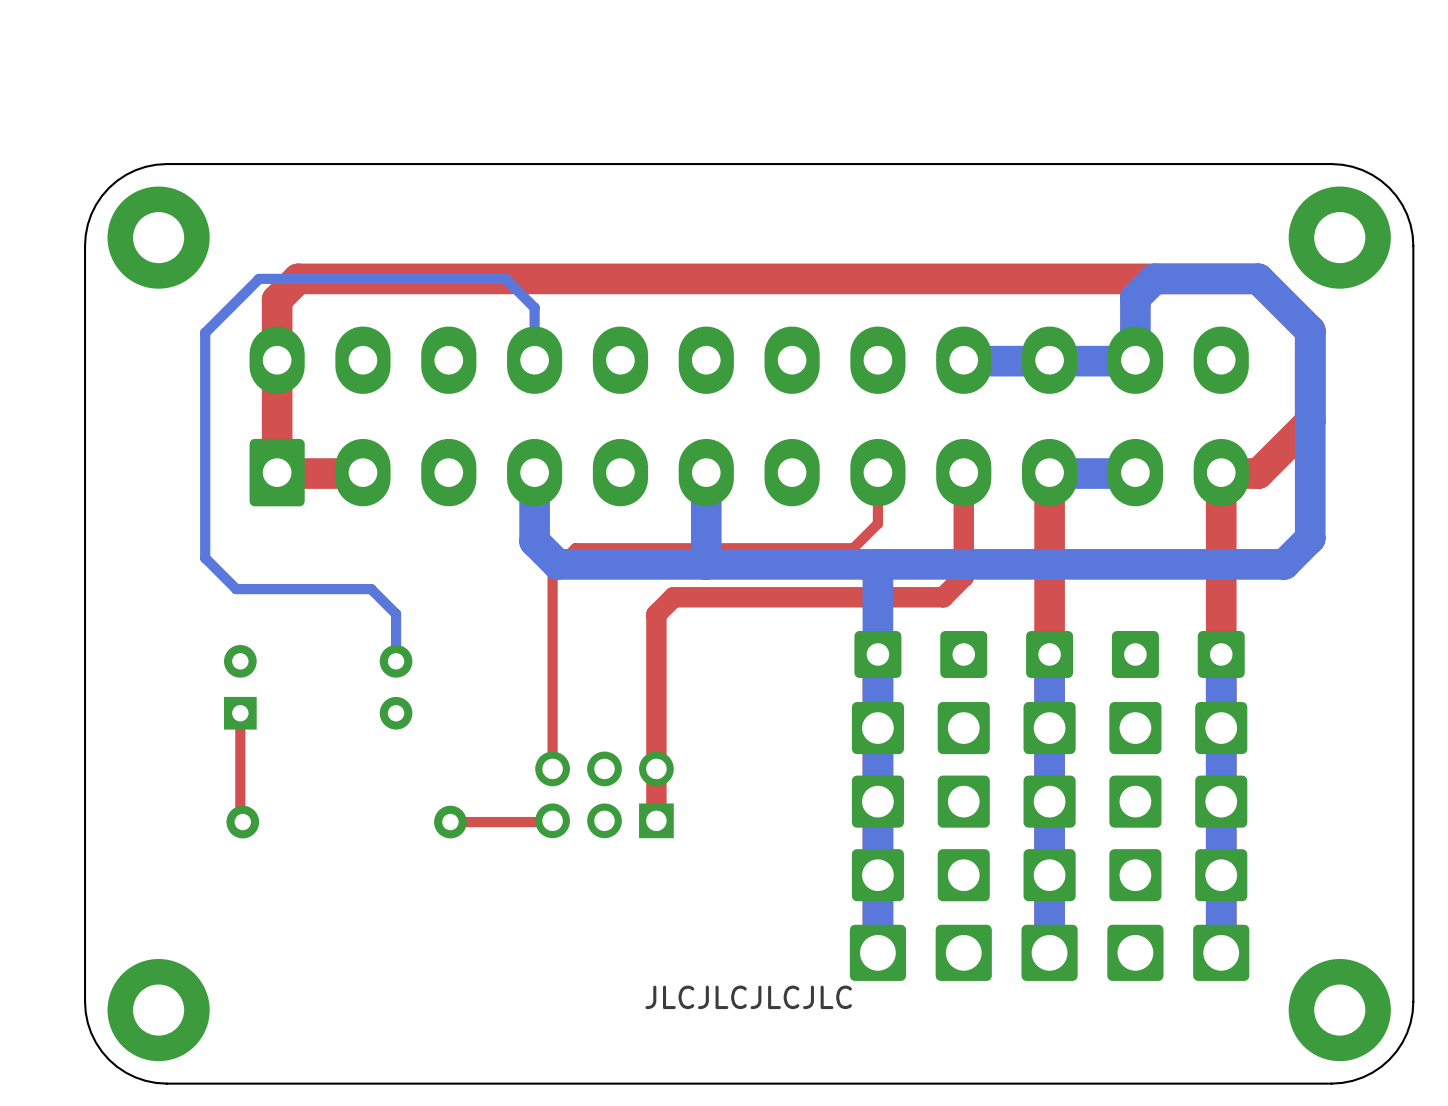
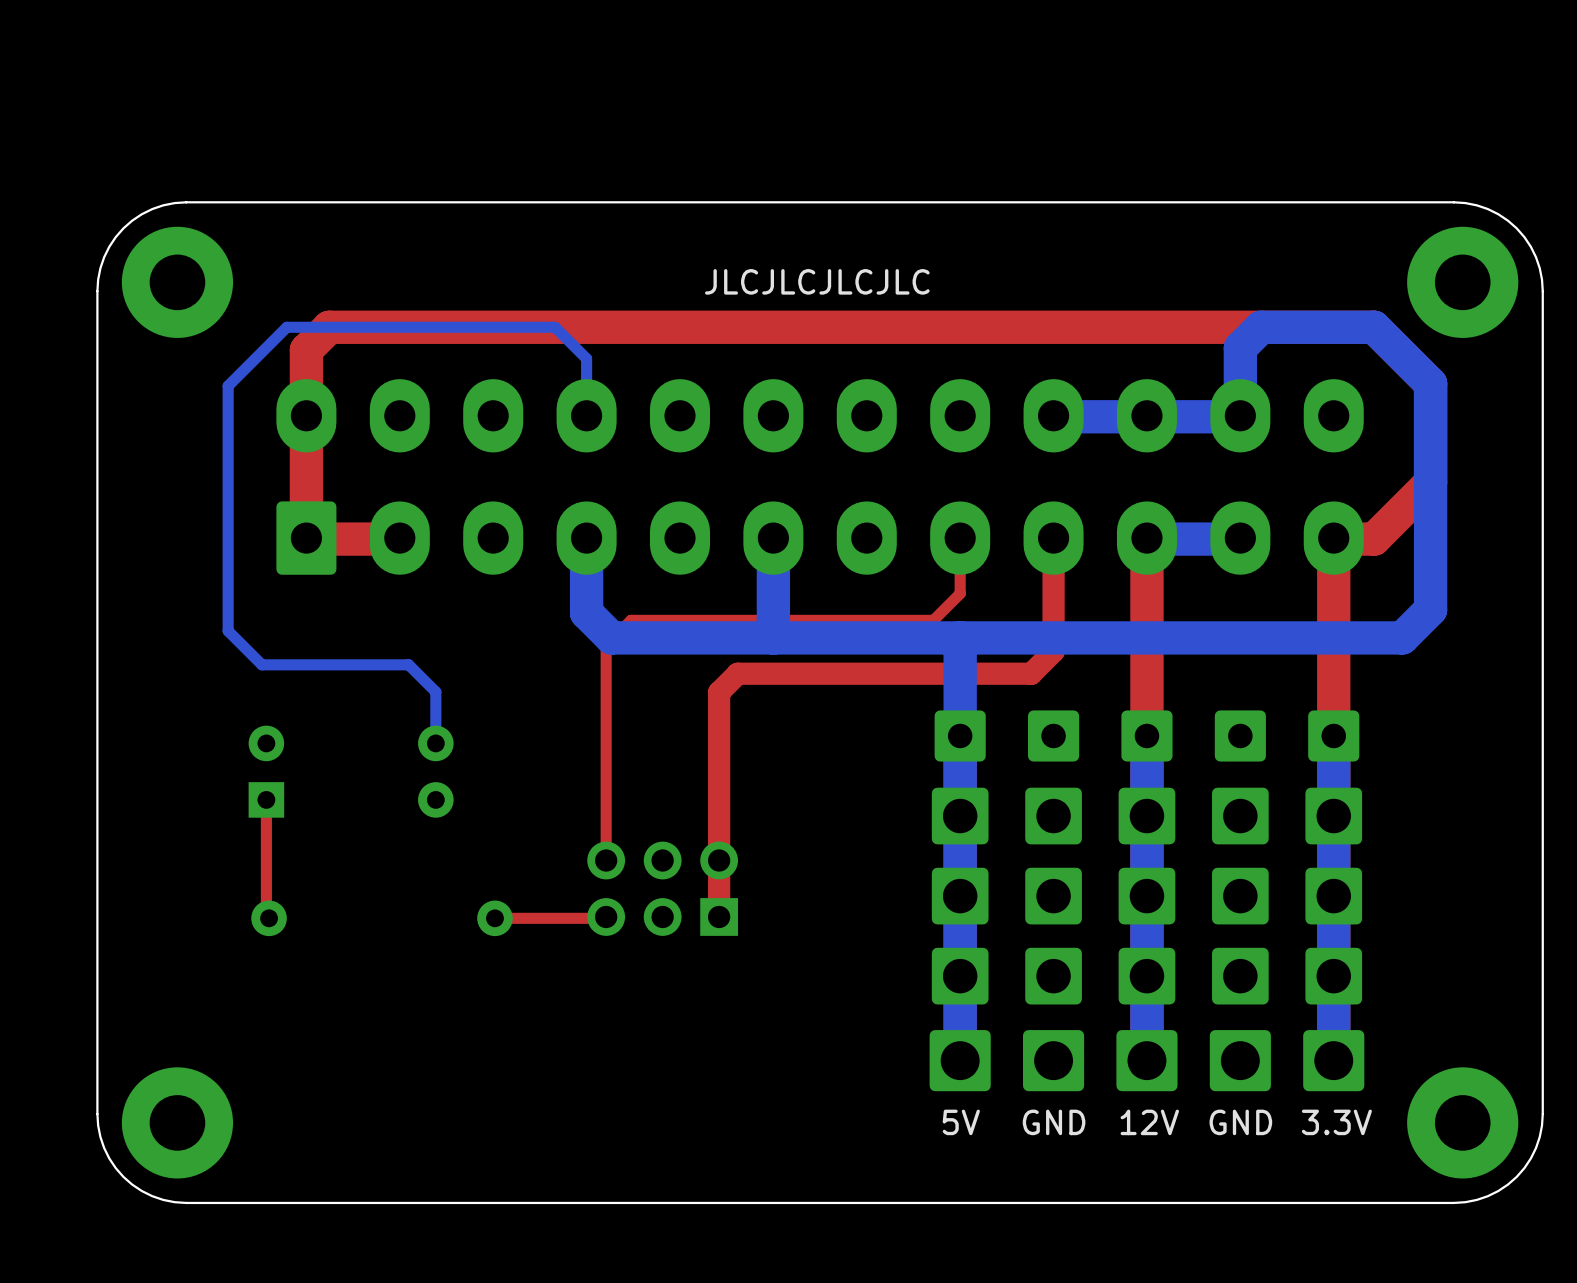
text: none -> JLCJLCJLCJLC (817, 281)
text: JLCJLCJLCJLC (748, 997) -> none
text: none -> 5V (961, 1122)
text: none -> GND (1054, 1122)
text: none -> 12V (1149, 1122)
text: none -> GND (1240, 1122)
text: none -> 3.3V (1336, 1122)

